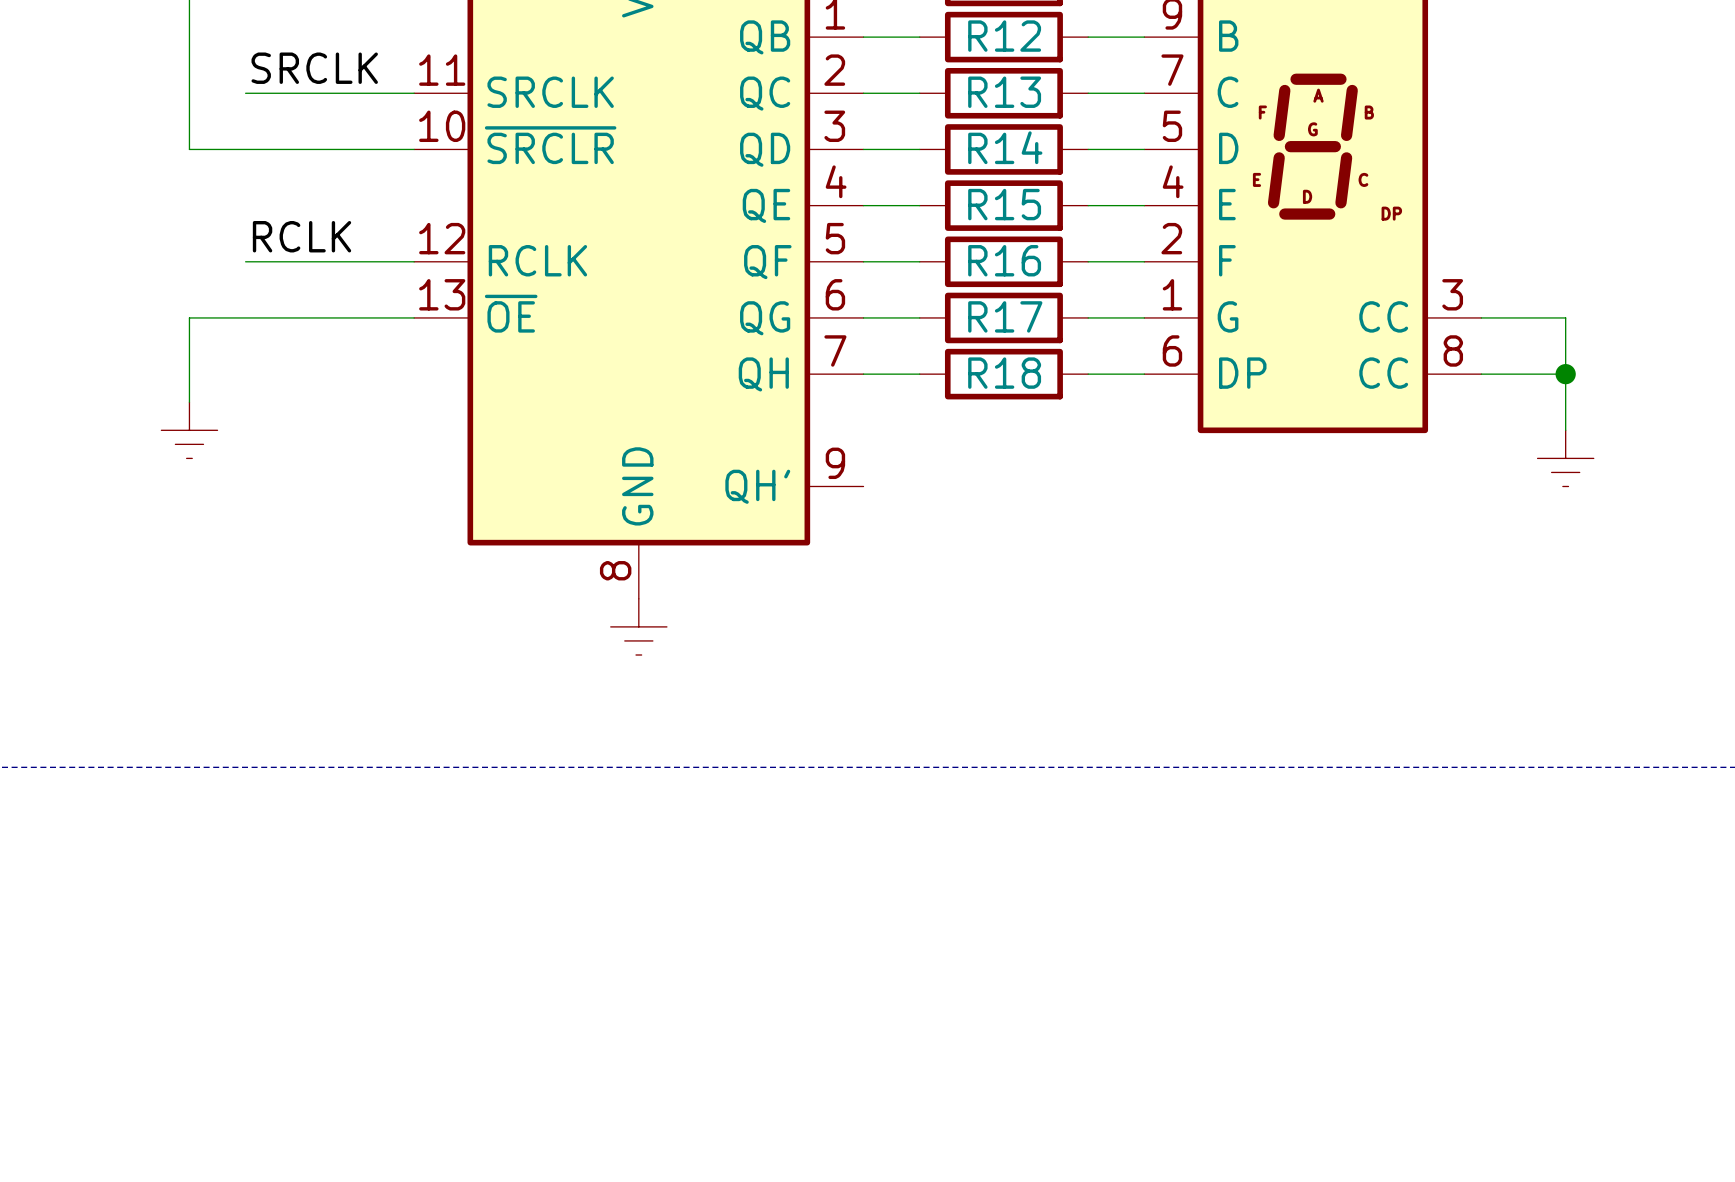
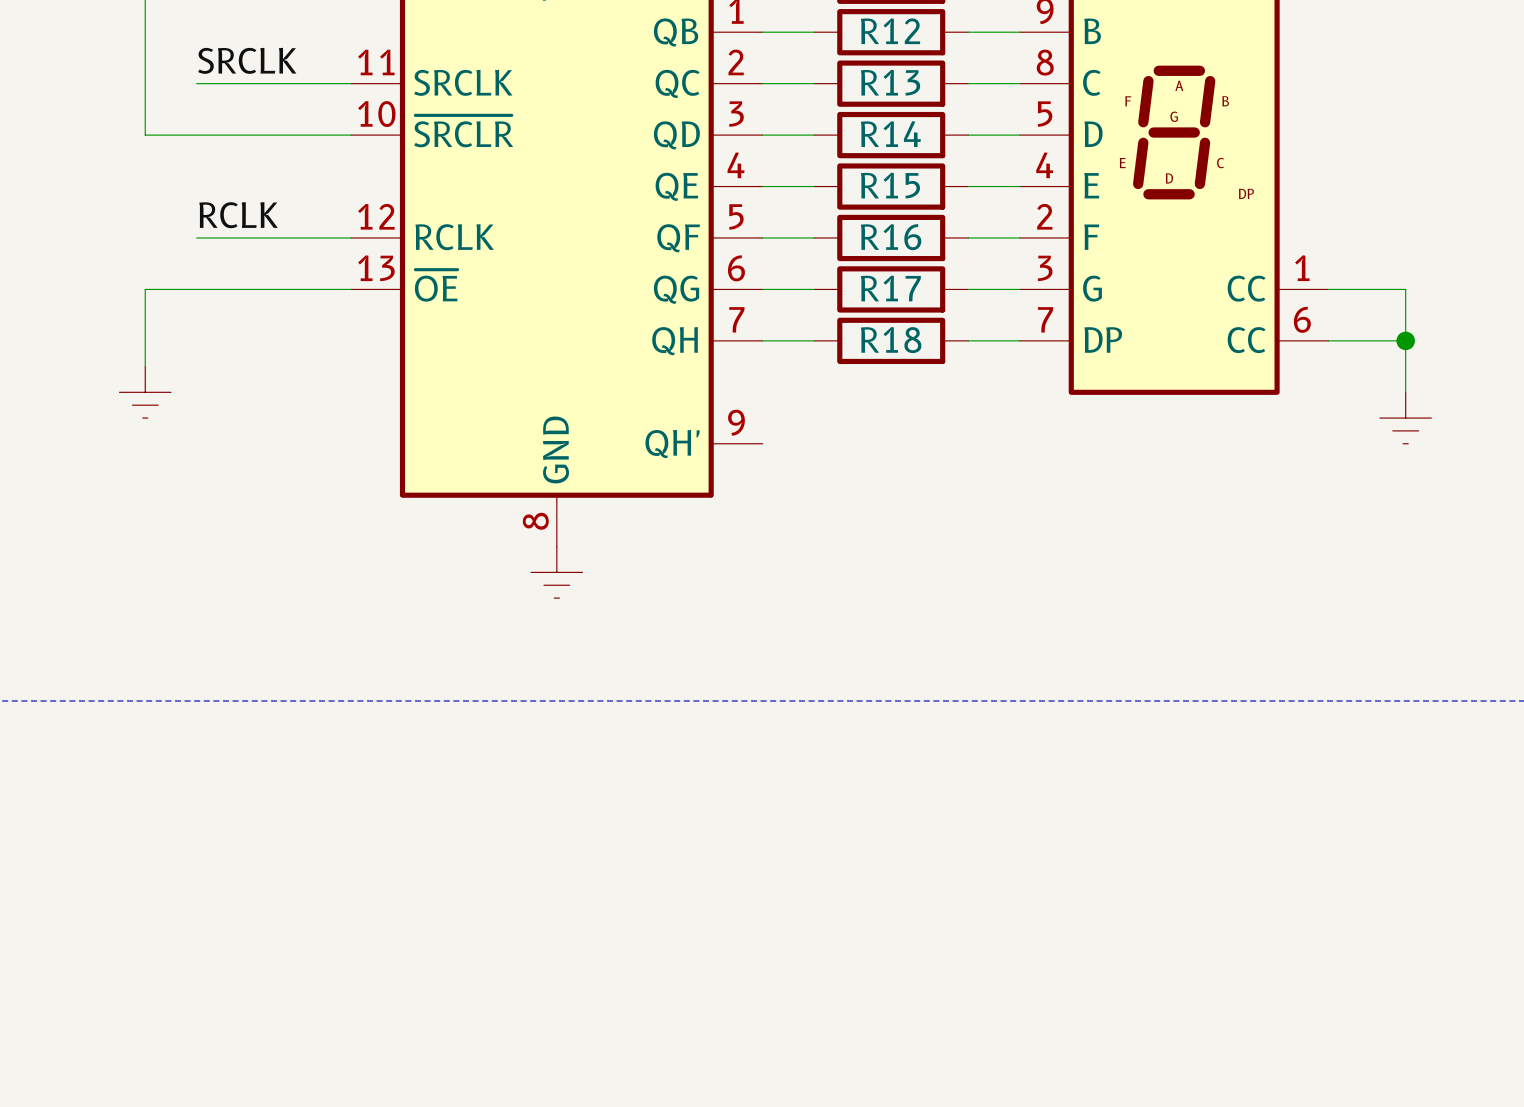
part pin number: 7 (1172, 70) -> 8 (1045, 62)
part pin number: 1 (1172, 294) -> 3 (1045, 268)
part pin number: 3 (1452, 294) -> 1 (1302, 268)
part pin number: 6 (1172, 350) -> 7 (1045, 319)
part pin number: 8 (1453, 350) -> 6 (1302, 319)

